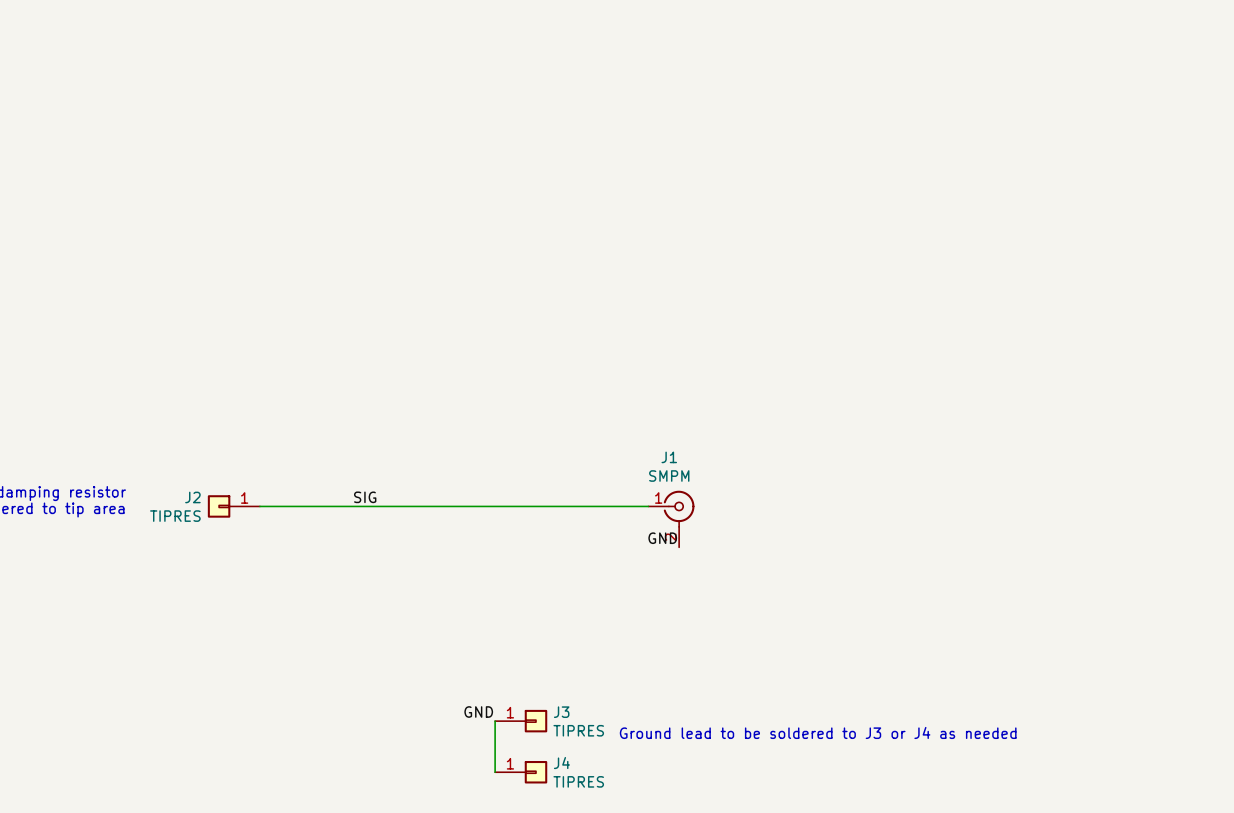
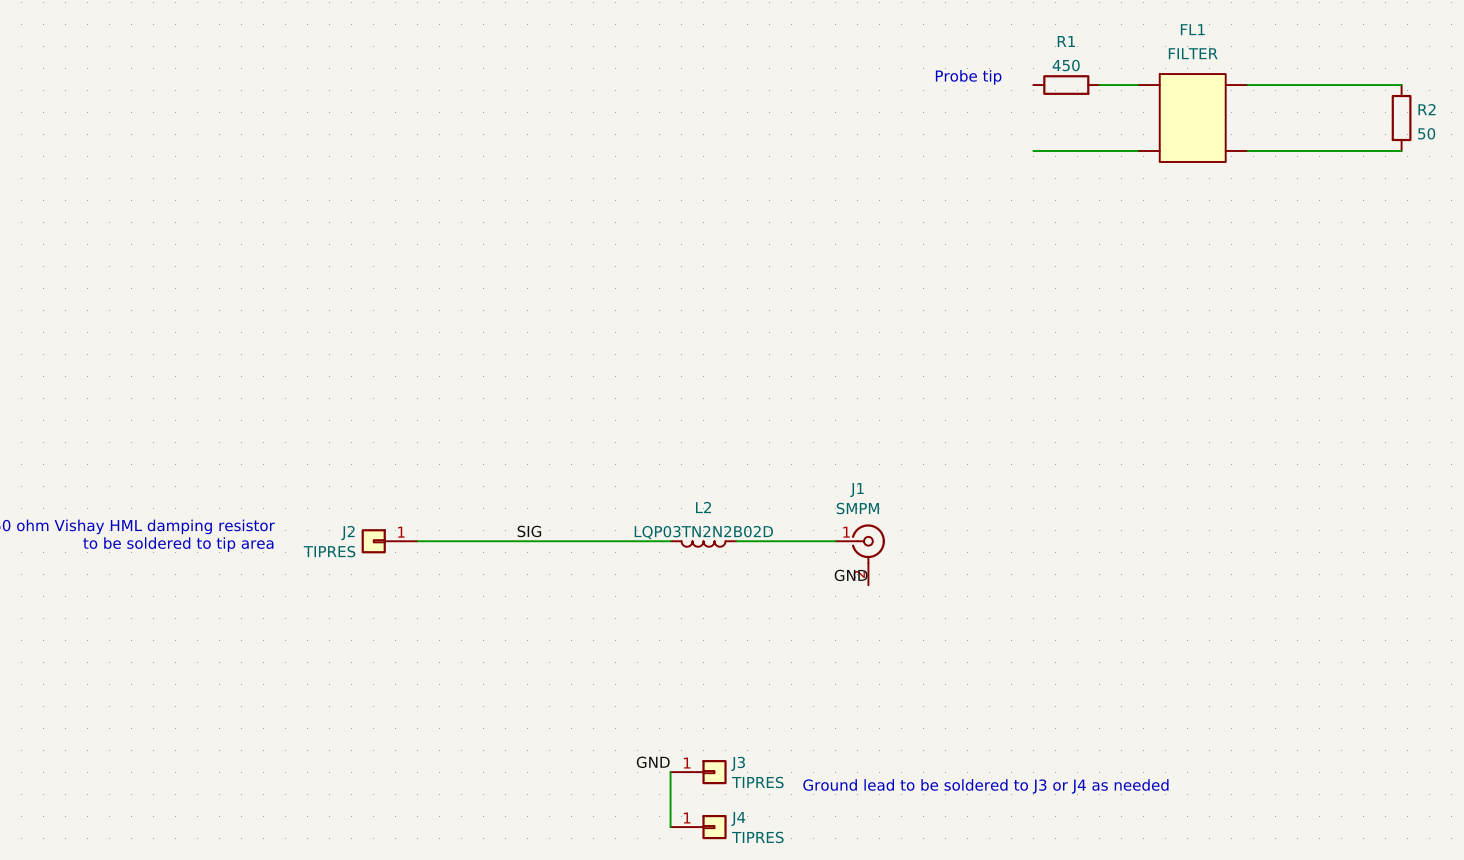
text: none -> Probe tip (968, 77)
R1: none -> 450 (1066, 85)
wire: none -> (1099, 85) (1137, 85)
wire: none -> (1247, 85) (1401, 85)
FL1: none -> FILTER (1192, 118)
R2: none -> 50 (1401, 118)
wire: none -> (1033, 151) (1137, 151)
wire: none -> (1247, 151) (1401, 151)
wire: (495, 506) (556, 506) -> none
L2: none -> LQP03TN2N2B02D (703, 544)

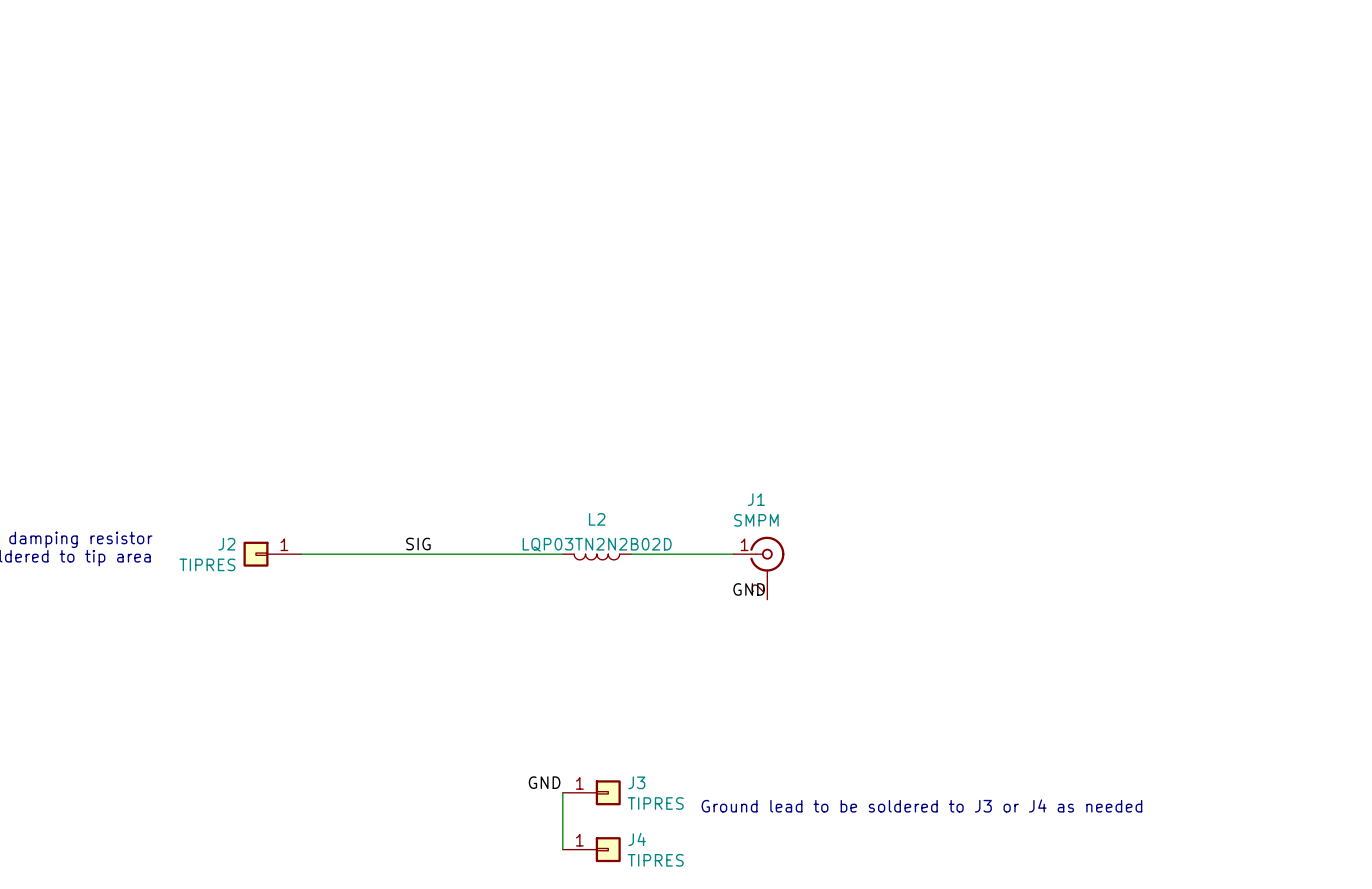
text: Probe tip (968, 77) -> none
R1: 450 (1066, 85) -> none
wire: (1099, 85) (1137, 85) -> none
wire: (1247, 85) (1401, 85) -> none
FL1: FILTER (1192, 118) -> none
R2: 50 (1401, 118) -> none
wire: (1033, 151) (1137, 151) -> none
wire: (1247, 151) (1401, 151) -> none

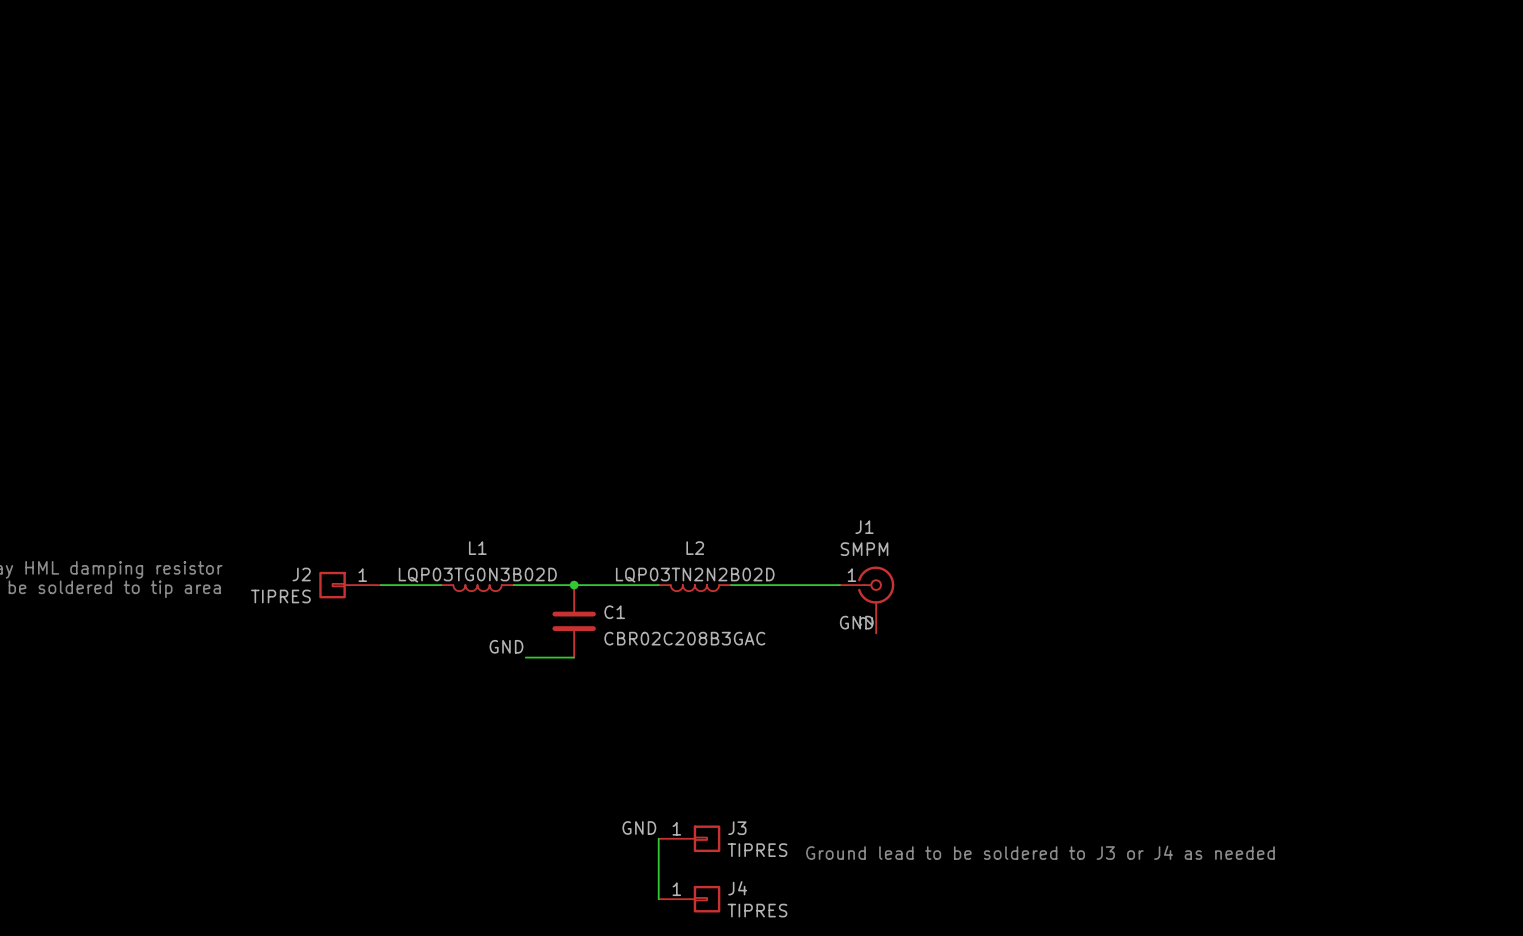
label: SIG (418, 544) -> none
wire: (358, 554) (426, 554) -> none
junction: none -> (574, 585)
L1: none -> LQP03TG0N3B02D (477, 588)
C1: none -> CBR02C208B3GAC (574, 621)
label: none -> GND (506, 646)
wire: none -> (525, 657) (574, 657)

